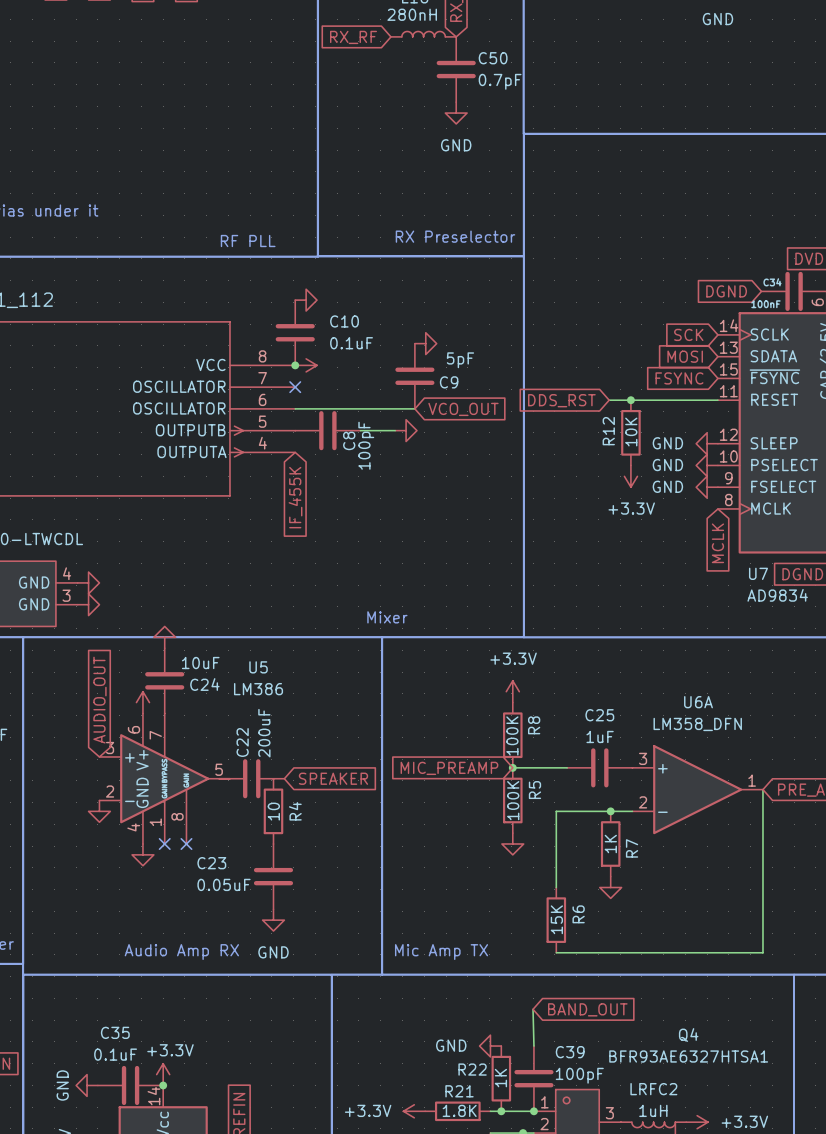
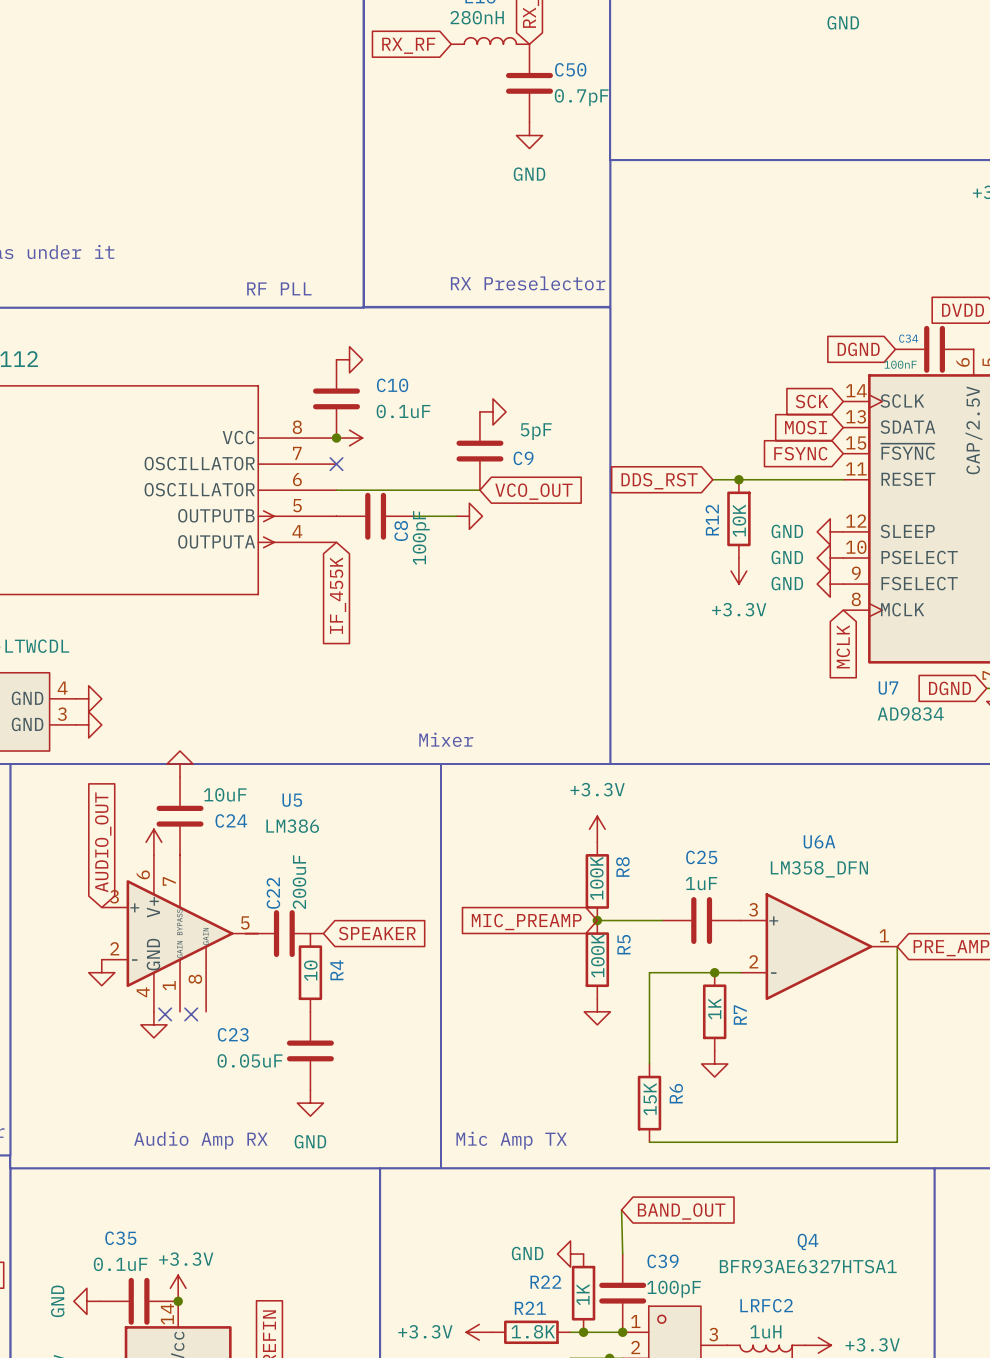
no-connect mark: (164, 844) -> none
no-connect mark: (186, 844) -> none
no-connect mark: none -> (165, 1014)
no-connect mark: none -> (191, 1014)

